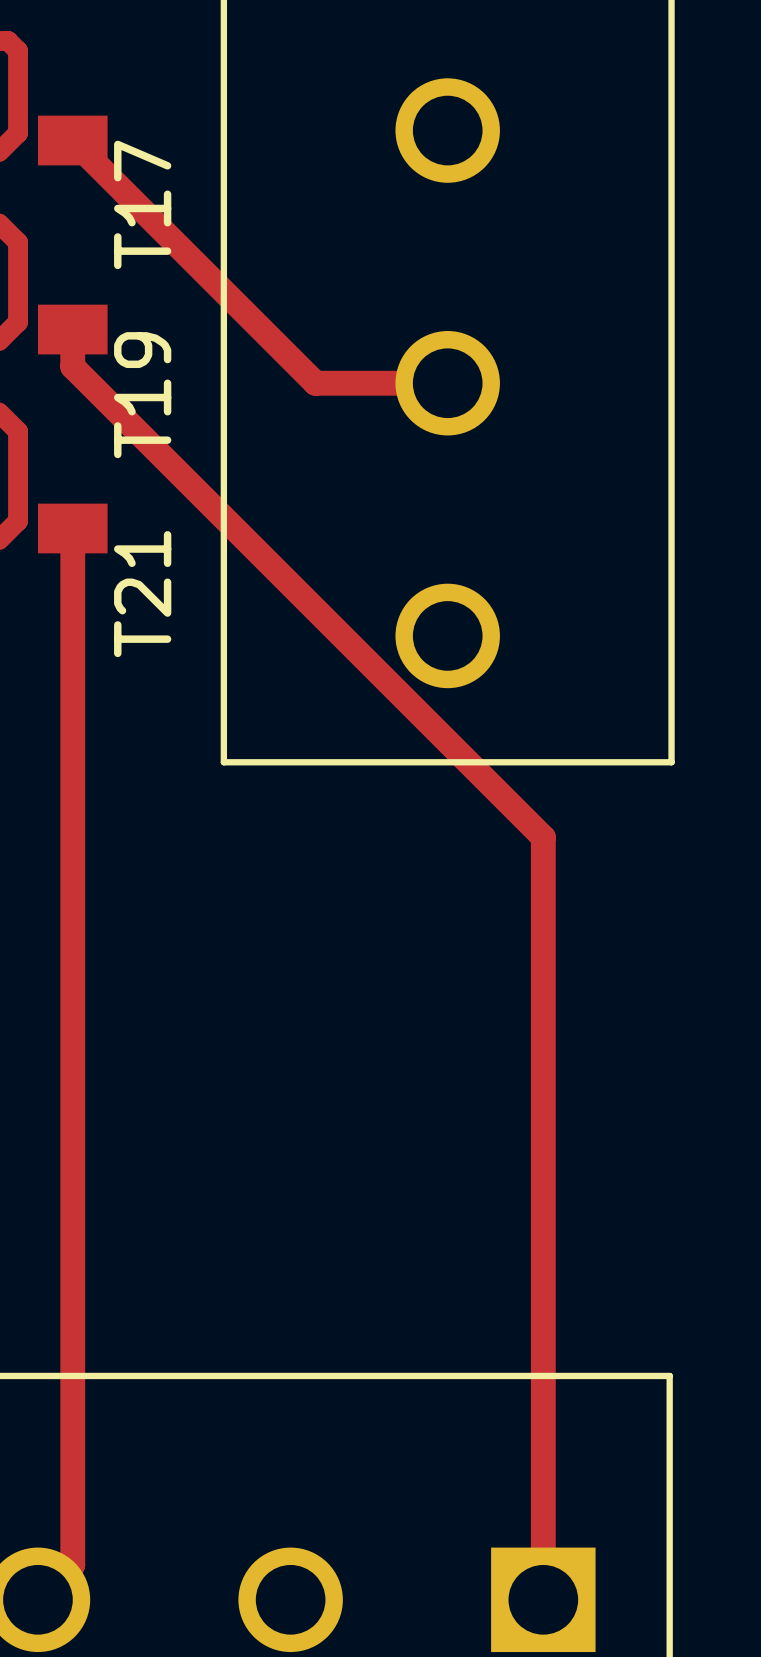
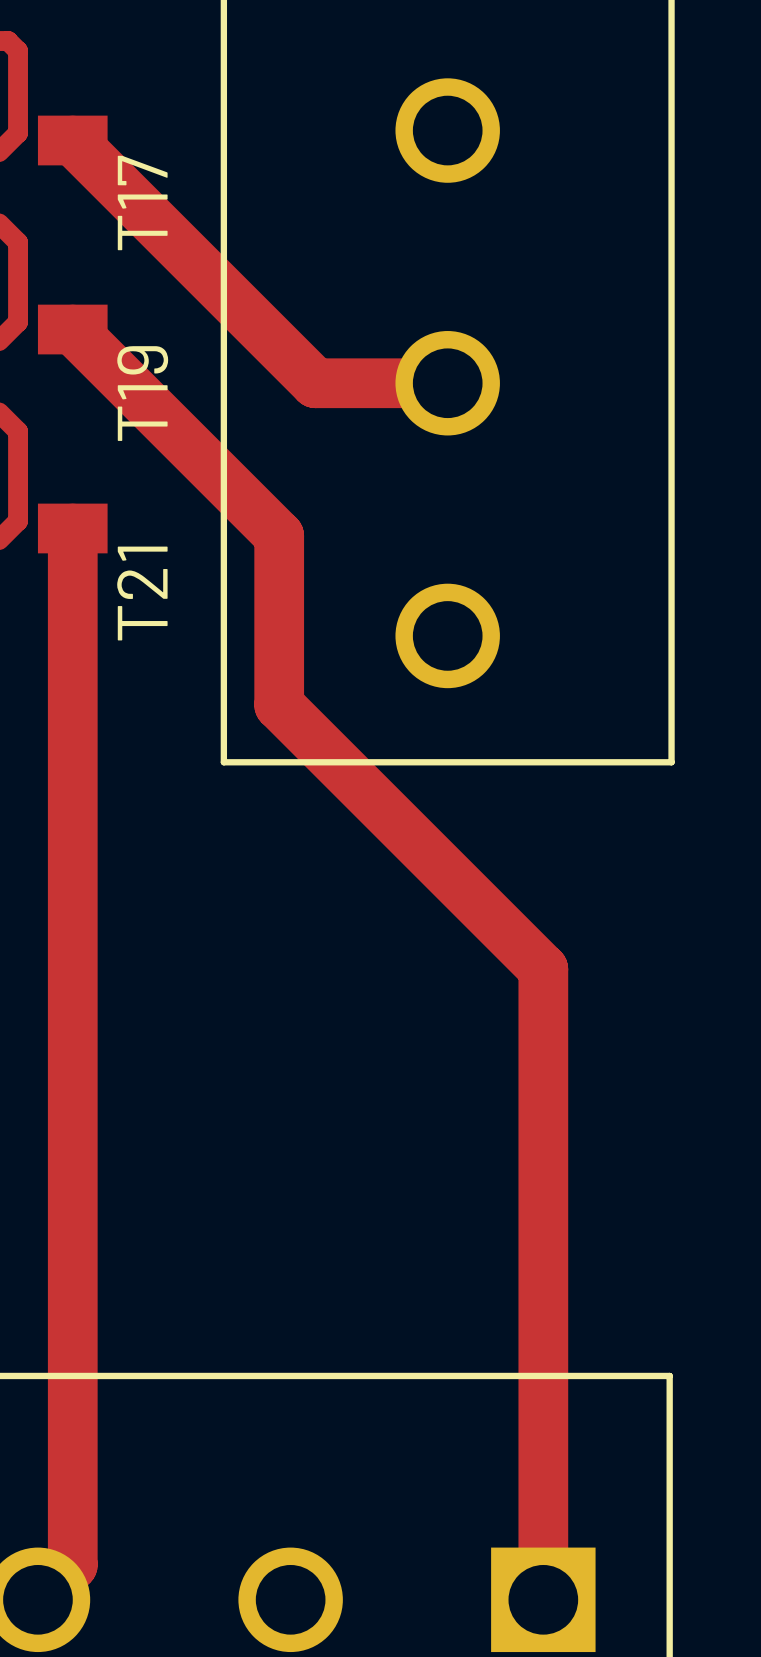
track width: thin (72, 140) (315, 383) (447, 383) -> thick (72, 140) (315, 383) (447, 383)
track: (72, 329) (72, 366) (543, 837) (543, 969) -> (72, 329) (279, 535) (279, 705) (543, 969)
track width: thin (72, 528) (72, 1564) (37, 1599) -> thick (72, 528) (72, 1564) (37, 1599)
track width: thin (543, 969) (543, 1599) -> thick (543, 969) (543, 1599)

